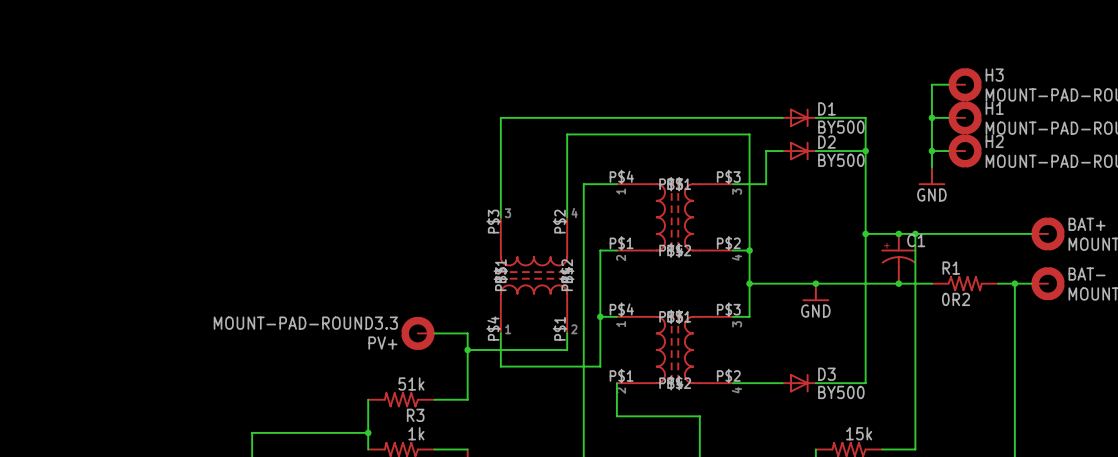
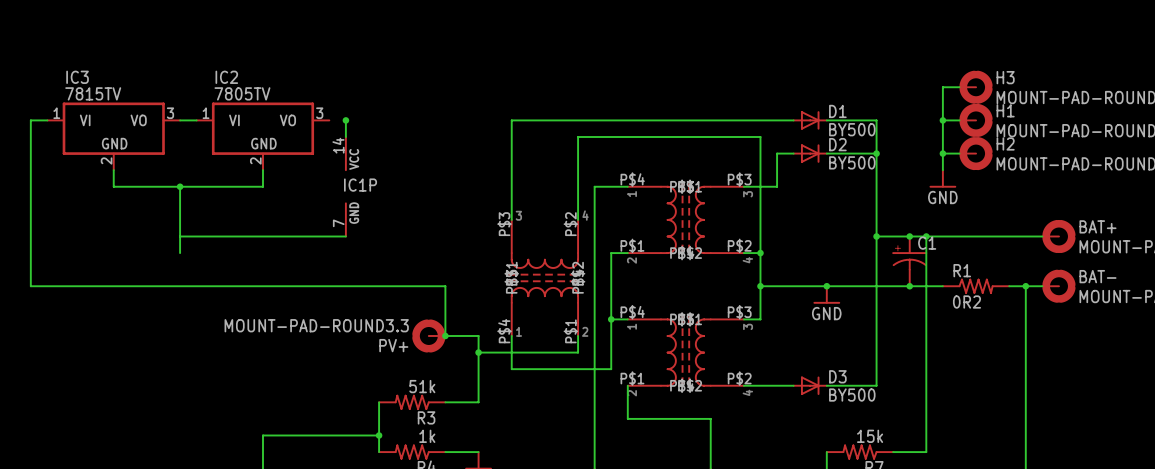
wire: none -> (47, 120) (30, 120) (30, 286) (445, 286) (445, 335)
wire: none -> (180, 120) (196, 120)
wire: none -> (345, 120) (345, 137)
junction: none -> (345, 120)
IC3: none -> 7815TV (113, 136)
IC2: none -> 7805TV (262, 136)
wire: none -> (113, 170) (113, 186) (262, 186) (262, 170)
wire: none -> (180, 186) (180, 253)
junction: none -> (180, 186)
IC1P: none -> (345, 186)
wire: none -> (180, 236) (345, 236)
junction: none -> (445, 335)

